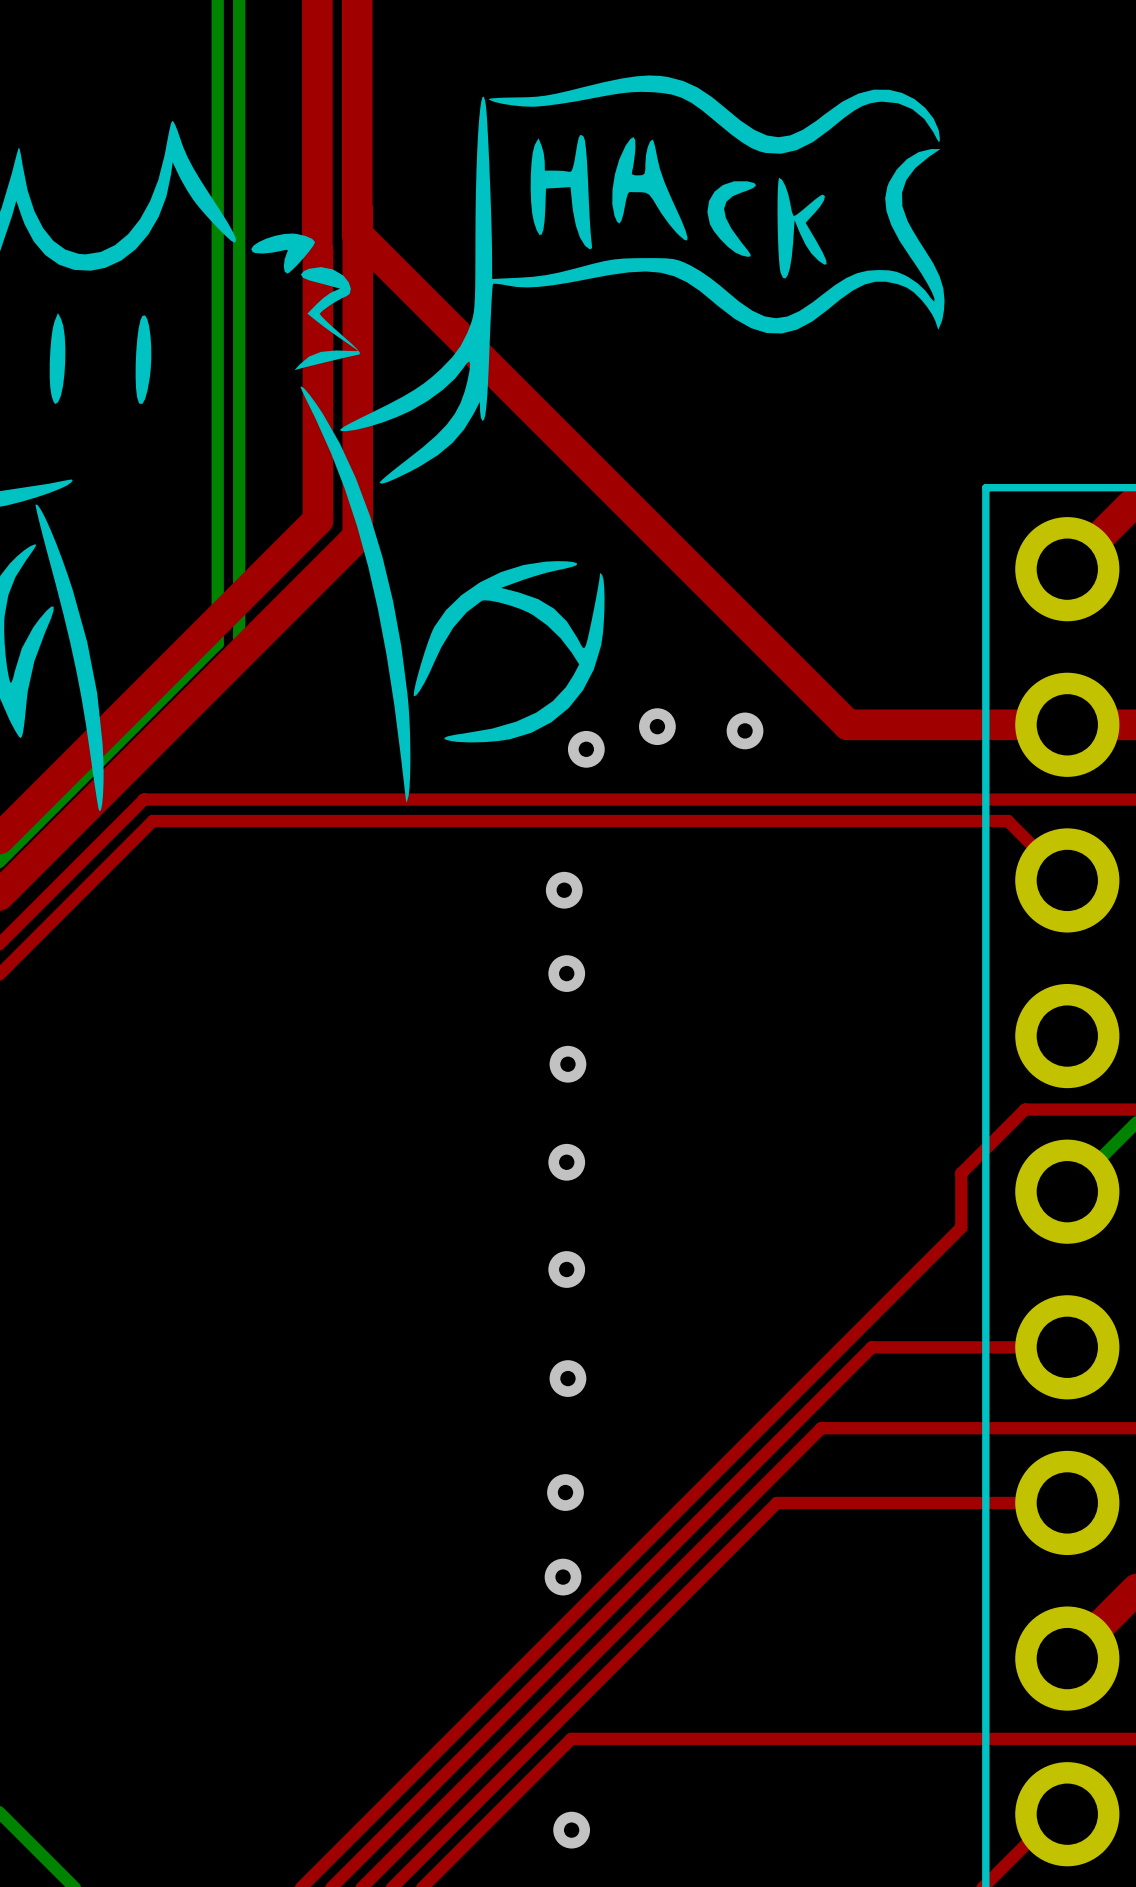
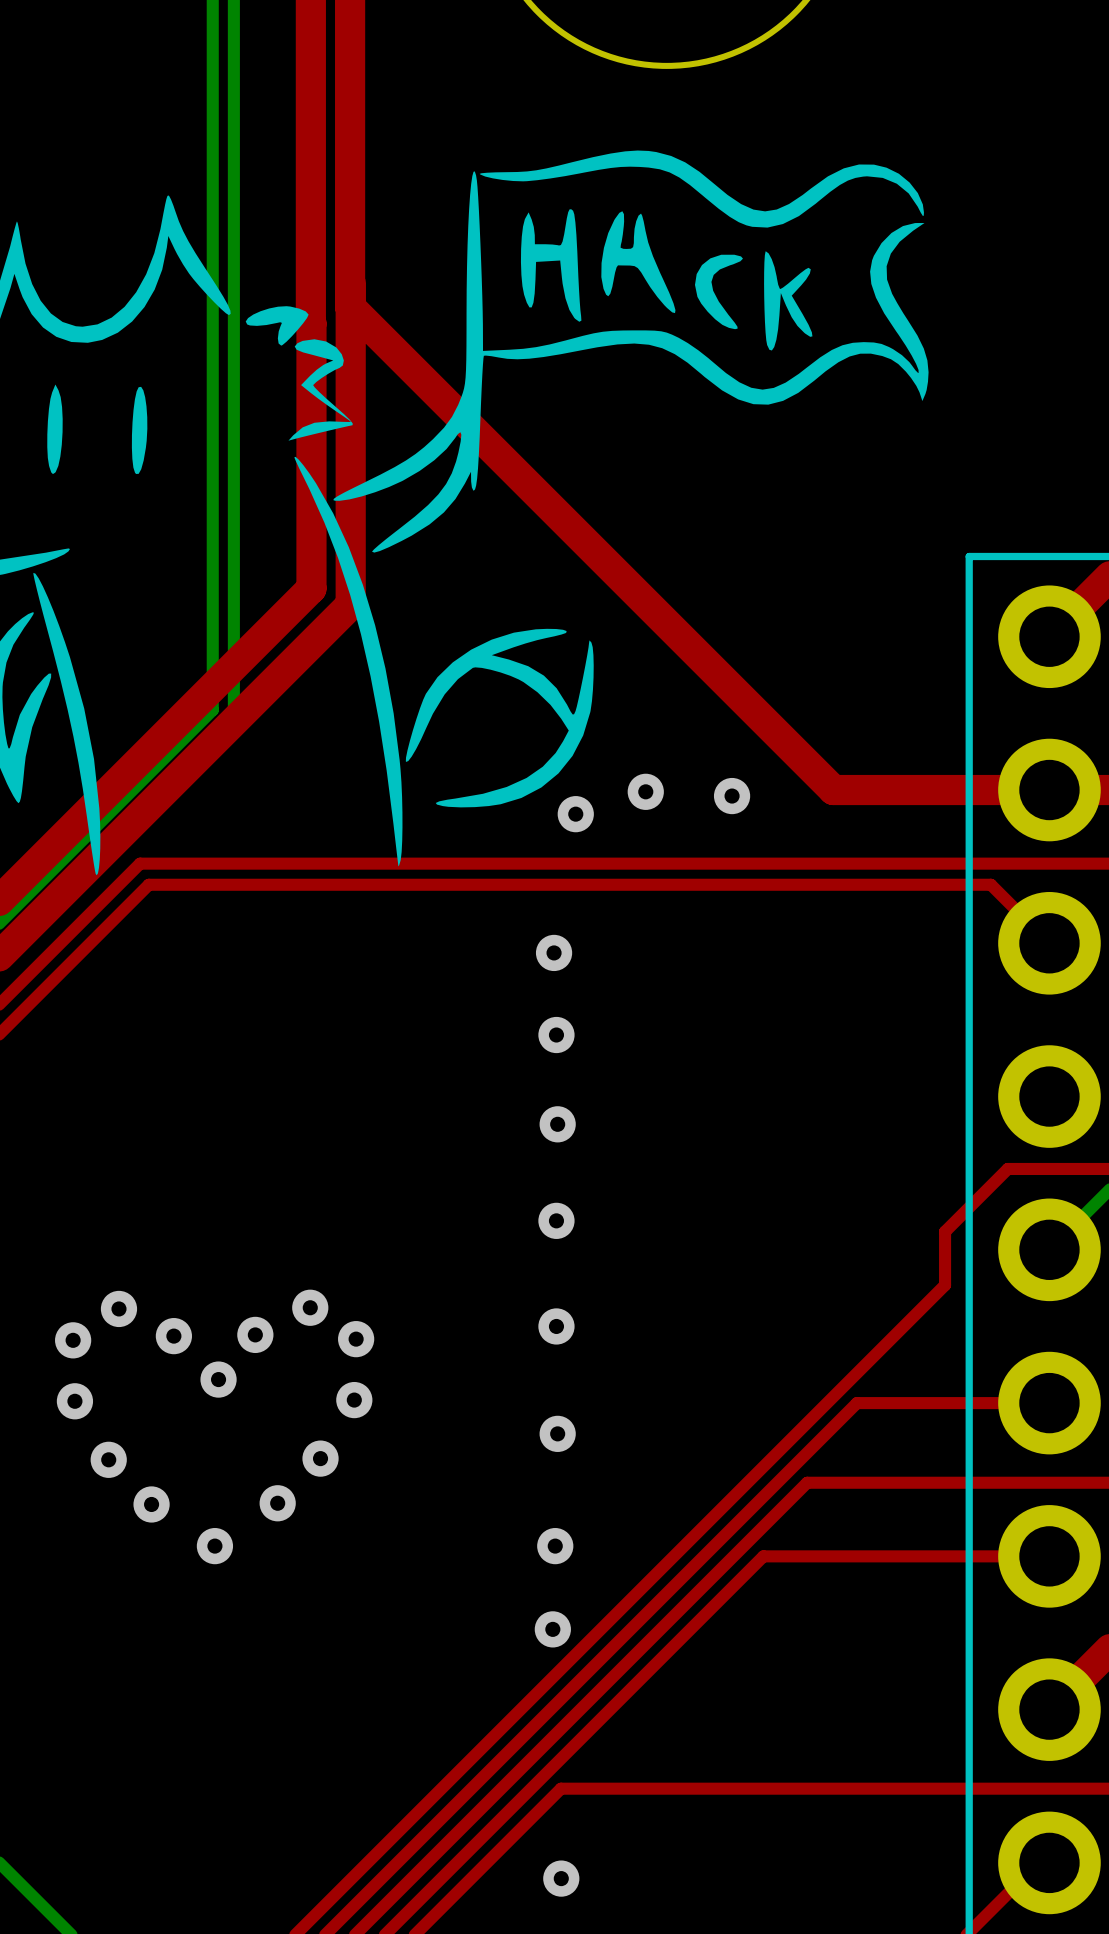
via: none -> (310, 1307)
via: none -> (118, 1308)
via: none -> (255, 1334)
via: none -> (173, 1336)
via: none -> (356, 1339)
via: none -> (73, 1340)
via: none -> (218, 1379)
via: none -> (354, 1400)
via: none -> (74, 1401)
via: none -> (320, 1458)
via: none -> (108, 1459)
via: none -> (277, 1503)
via: none -> (151, 1504)
via: none -> (214, 1546)

